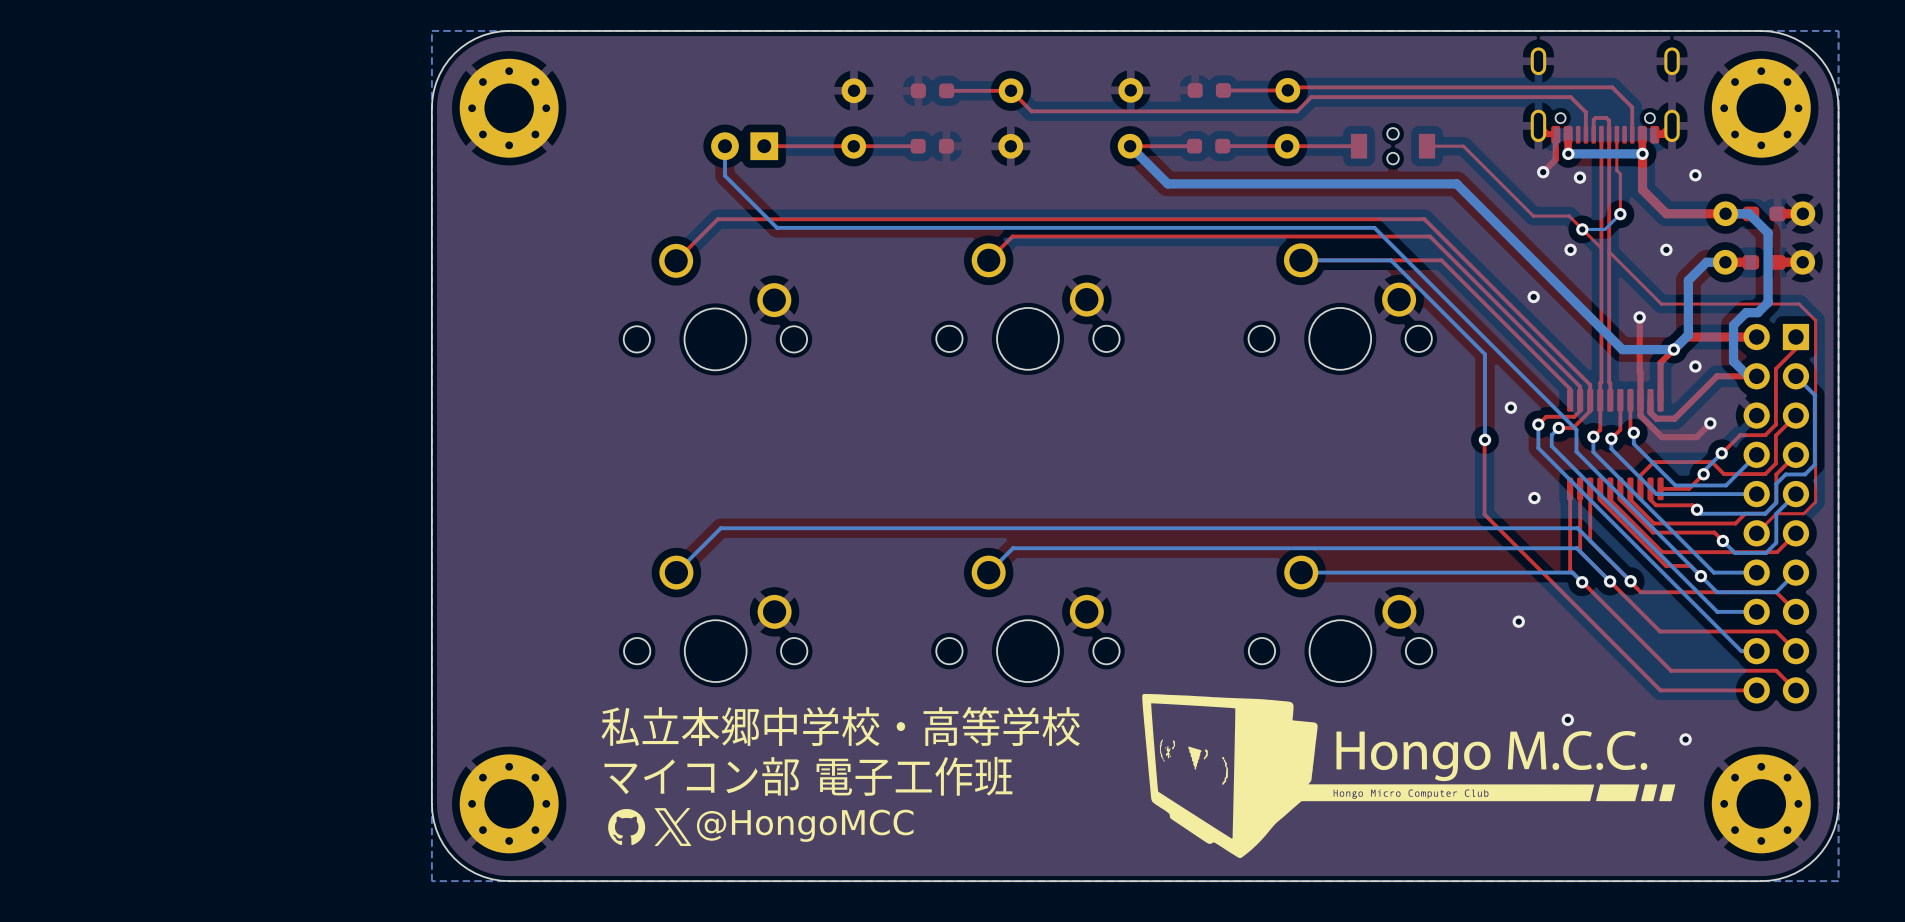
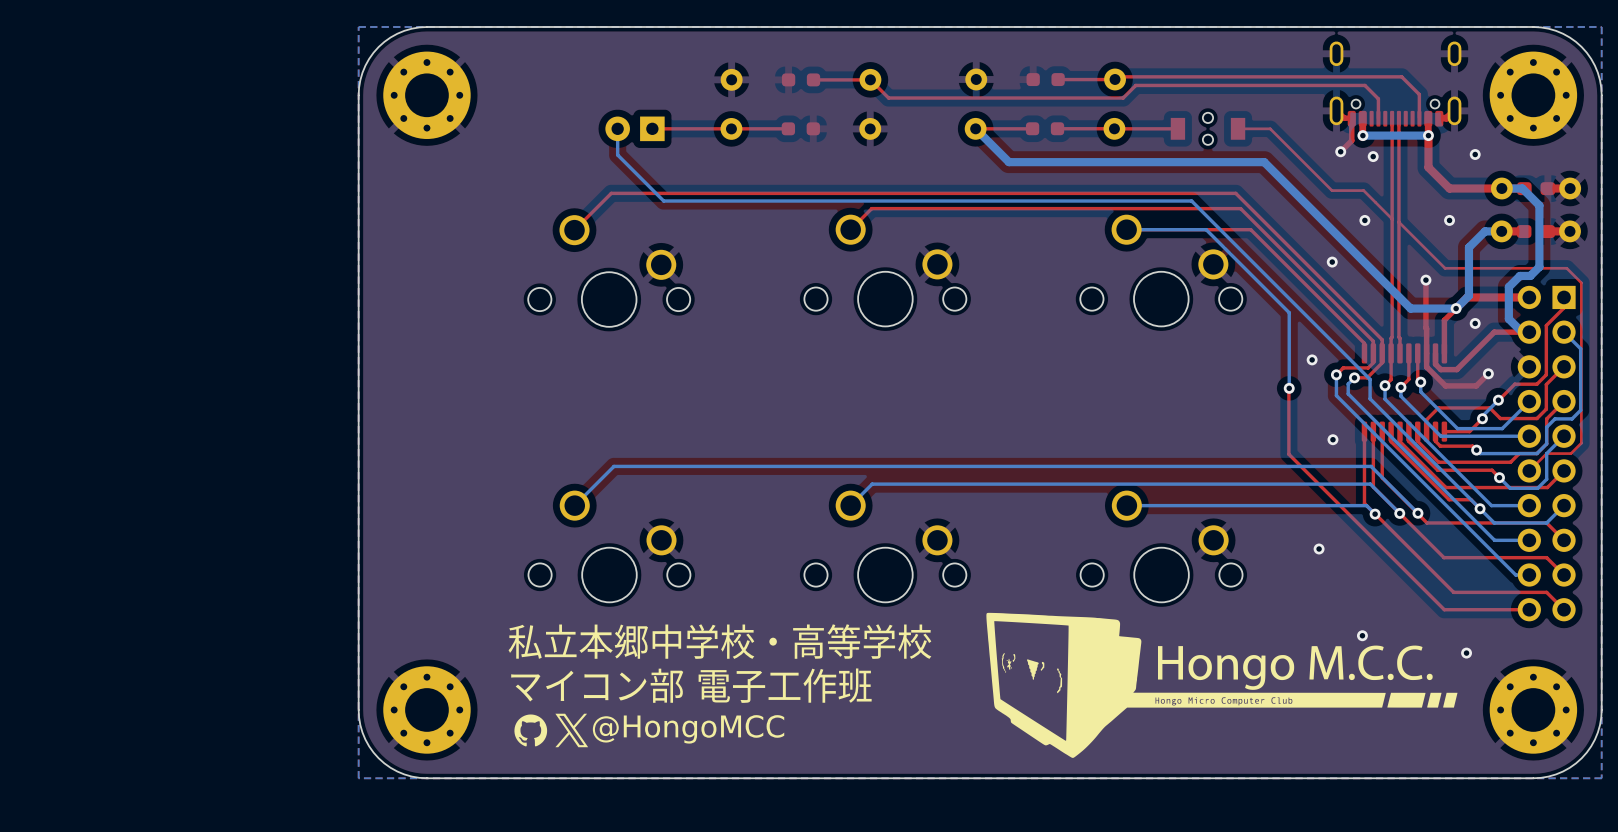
top track: (1609, 134) (1609, 120) (1606, 117) (1595, 117) (1593, 119) (1593, 134) -> none
top track: (1616, 134) (1616, 170) (1620, 173) (1620, 214) -> none
bottom track: (1620, 214) (1605, 229) (1582, 229) -> none
via: (1620, 214) -> none
via: (1582, 229) -> none

